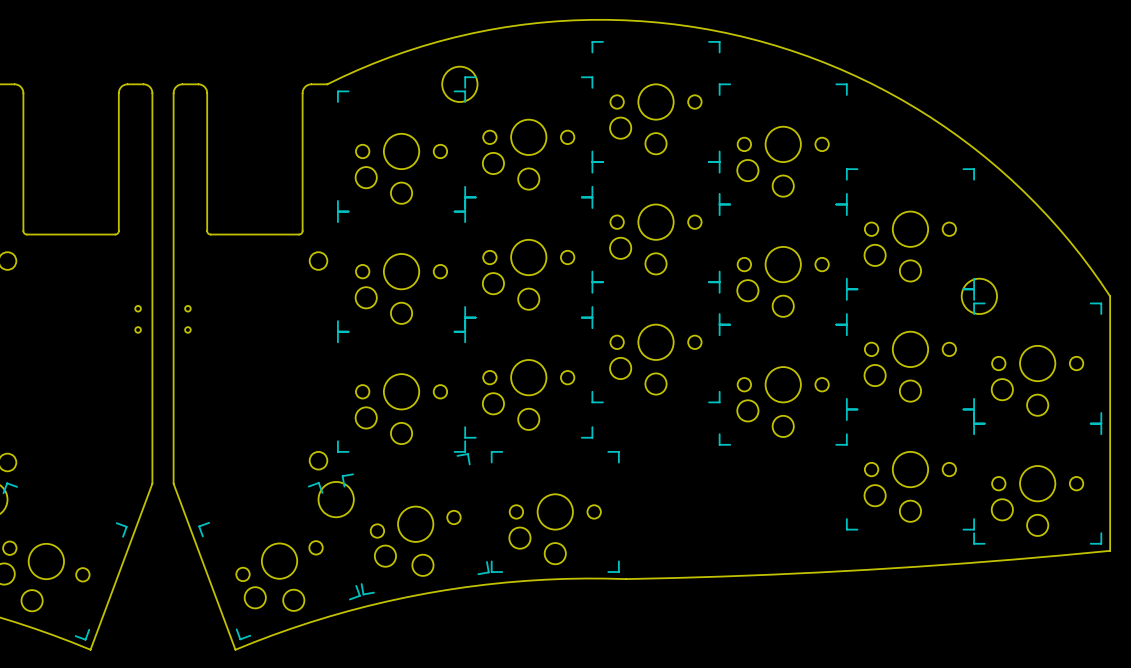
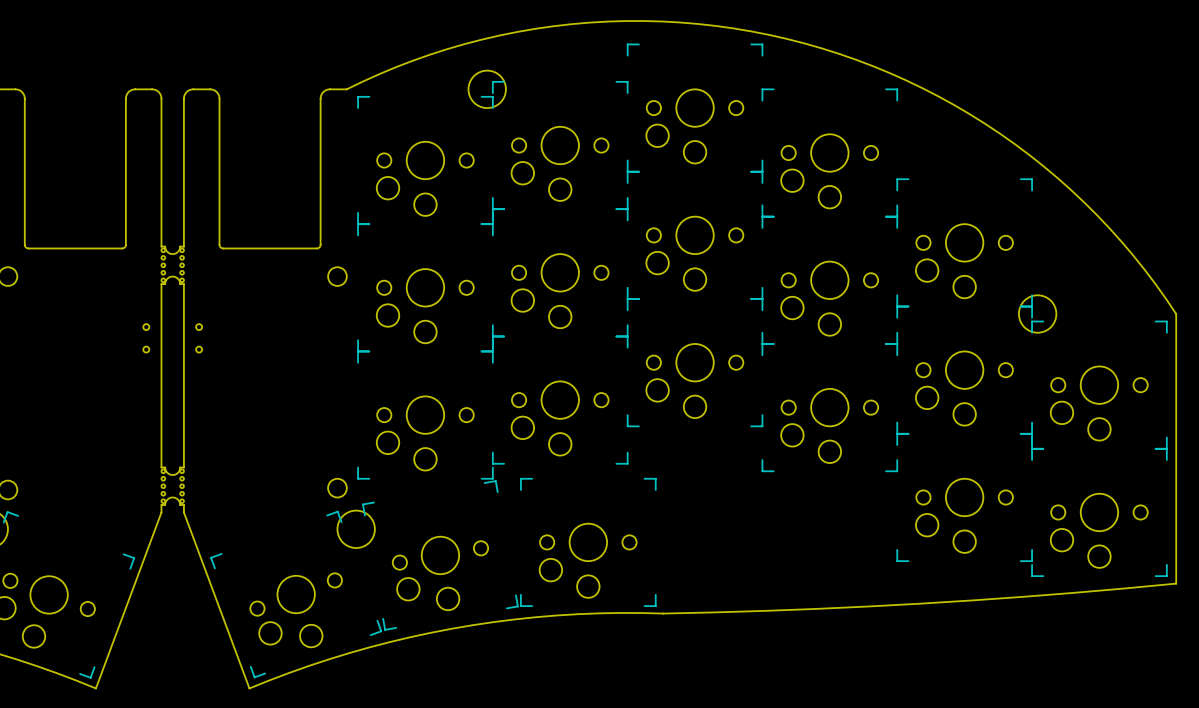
board edge: (152, 232) (152, 268) -> (161, 246) (165, 246) (167, 251) (172, 254) (178, 251) (180, 246) (183, 246)
board edge: (173, 232) (173, 268) -> (161, 284) (165, 284) (167, 278) (172, 276) (178, 278) (180, 284) (183, 284)
part: none -> (163, 250)
part: none -> (182, 250)
part: none -> (163, 257)
part: none -> (182, 257)
part: none -> (163, 265)
part: none -> (182, 265)
part: none -> (163, 272)
part: none -> (182, 272)
part: none -> (163, 280)
part: none -> (182, 280)
board edge: (152, 441) (152, 476) -> (161, 467) (165, 467) (167, 472) (172, 475) (178, 472) (180, 467) (183, 467)
board edge: (173, 441) (173, 476) -> (161, 504) (165, 504) (167, 500) (172, 497) (178, 500) (180, 504) (183, 504)
part: none -> (163, 471)
part: none -> (182, 471)
part: none -> (163, 478)
part: none -> (182, 478)
part: none -> (163, 486)
part: none -> (182, 486)
part: none -> (163, 493)
part: none -> (182, 493)
part: none -> (163, 501)
part: none -> (182, 501)

